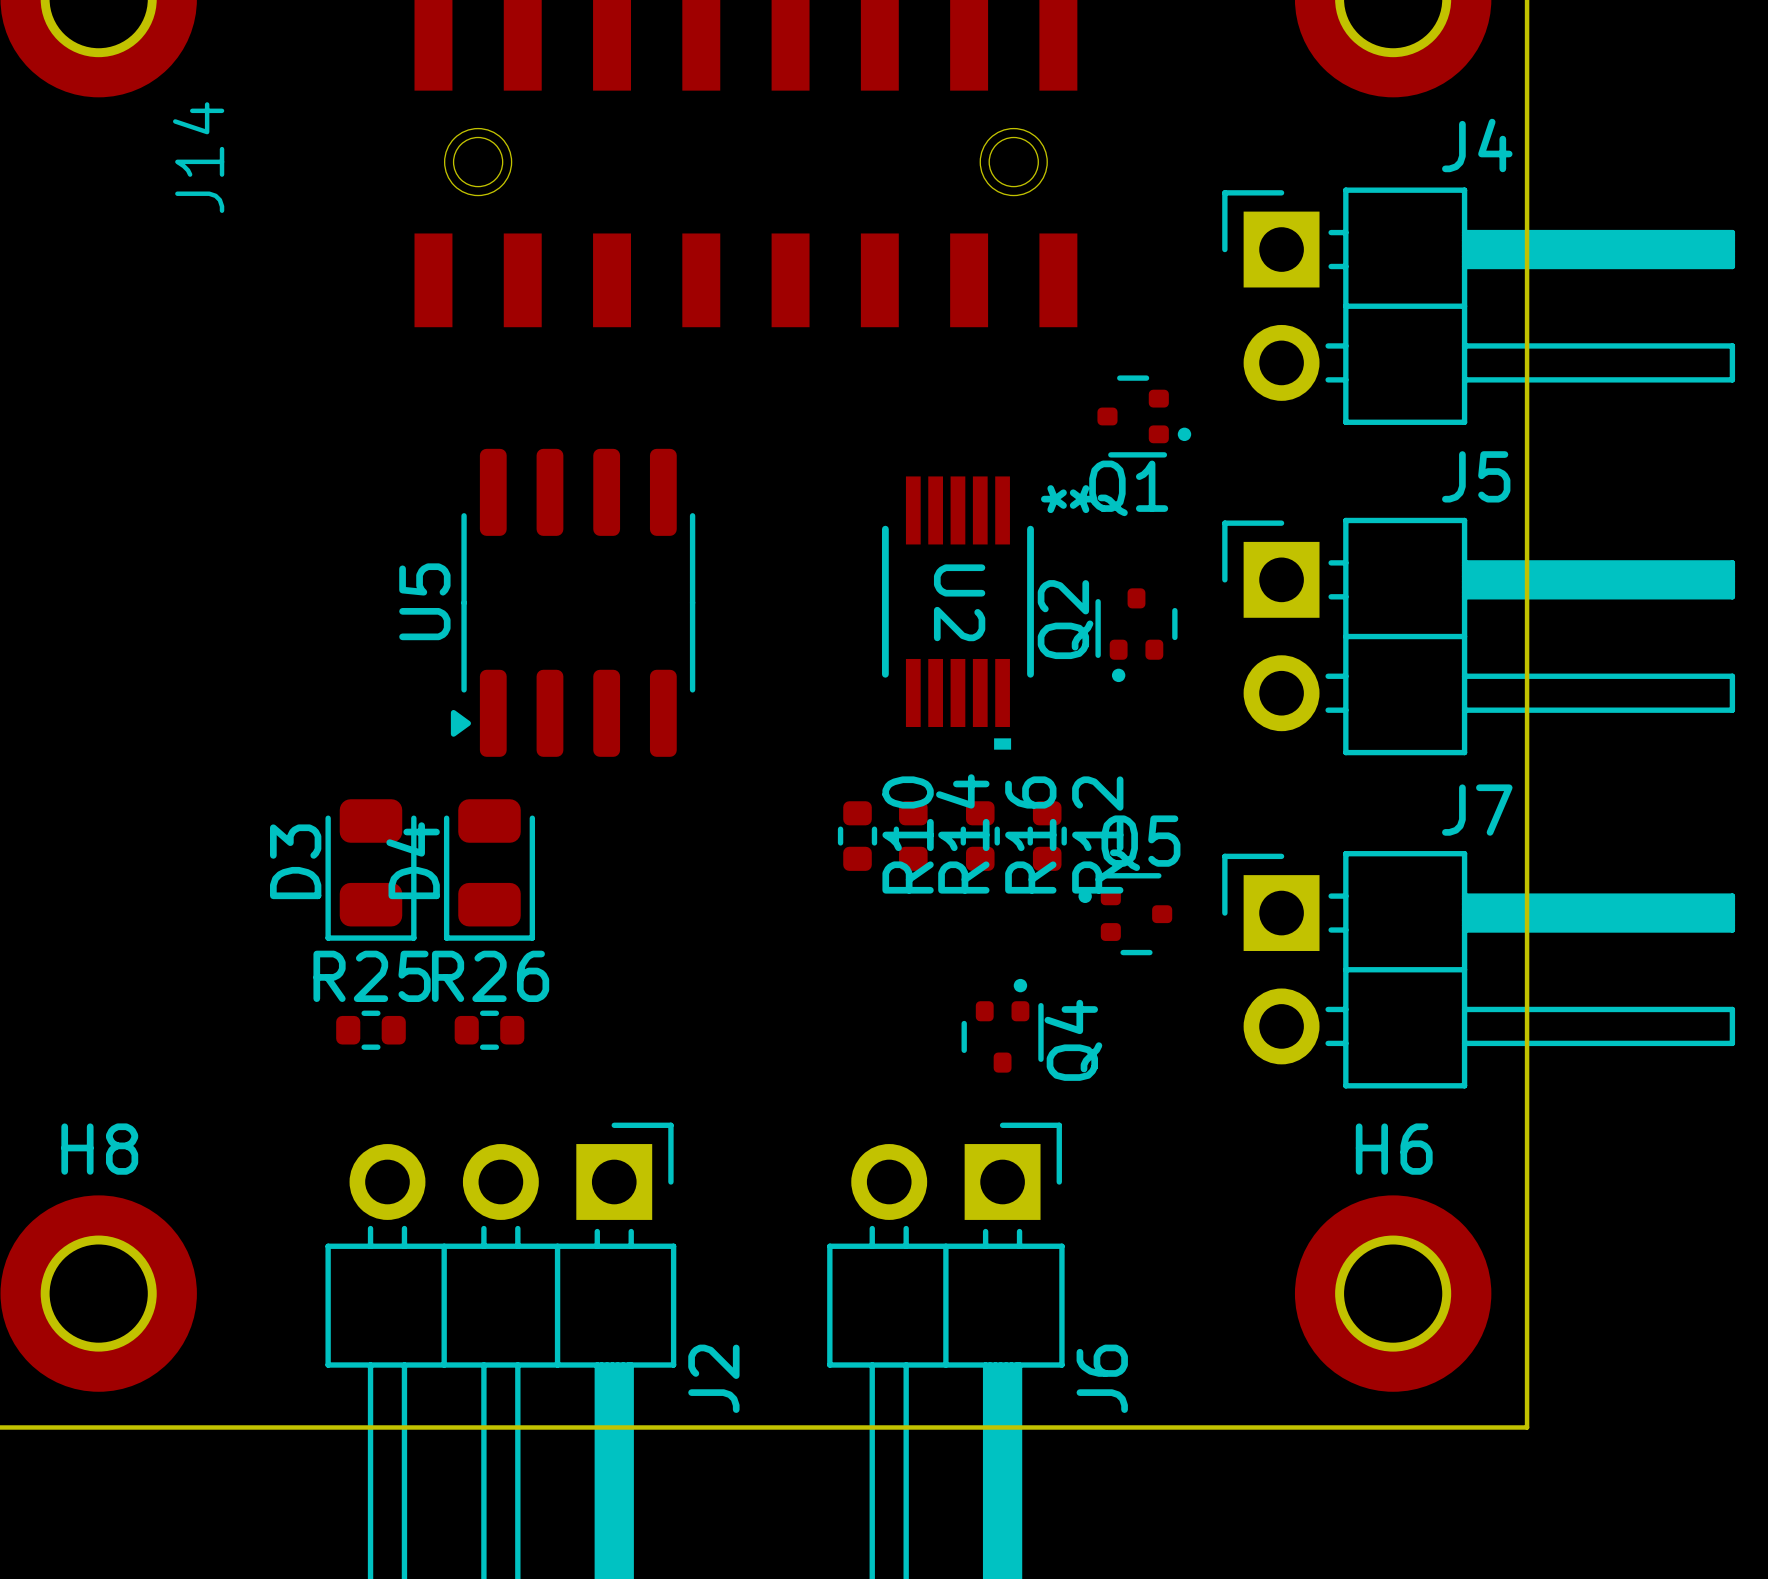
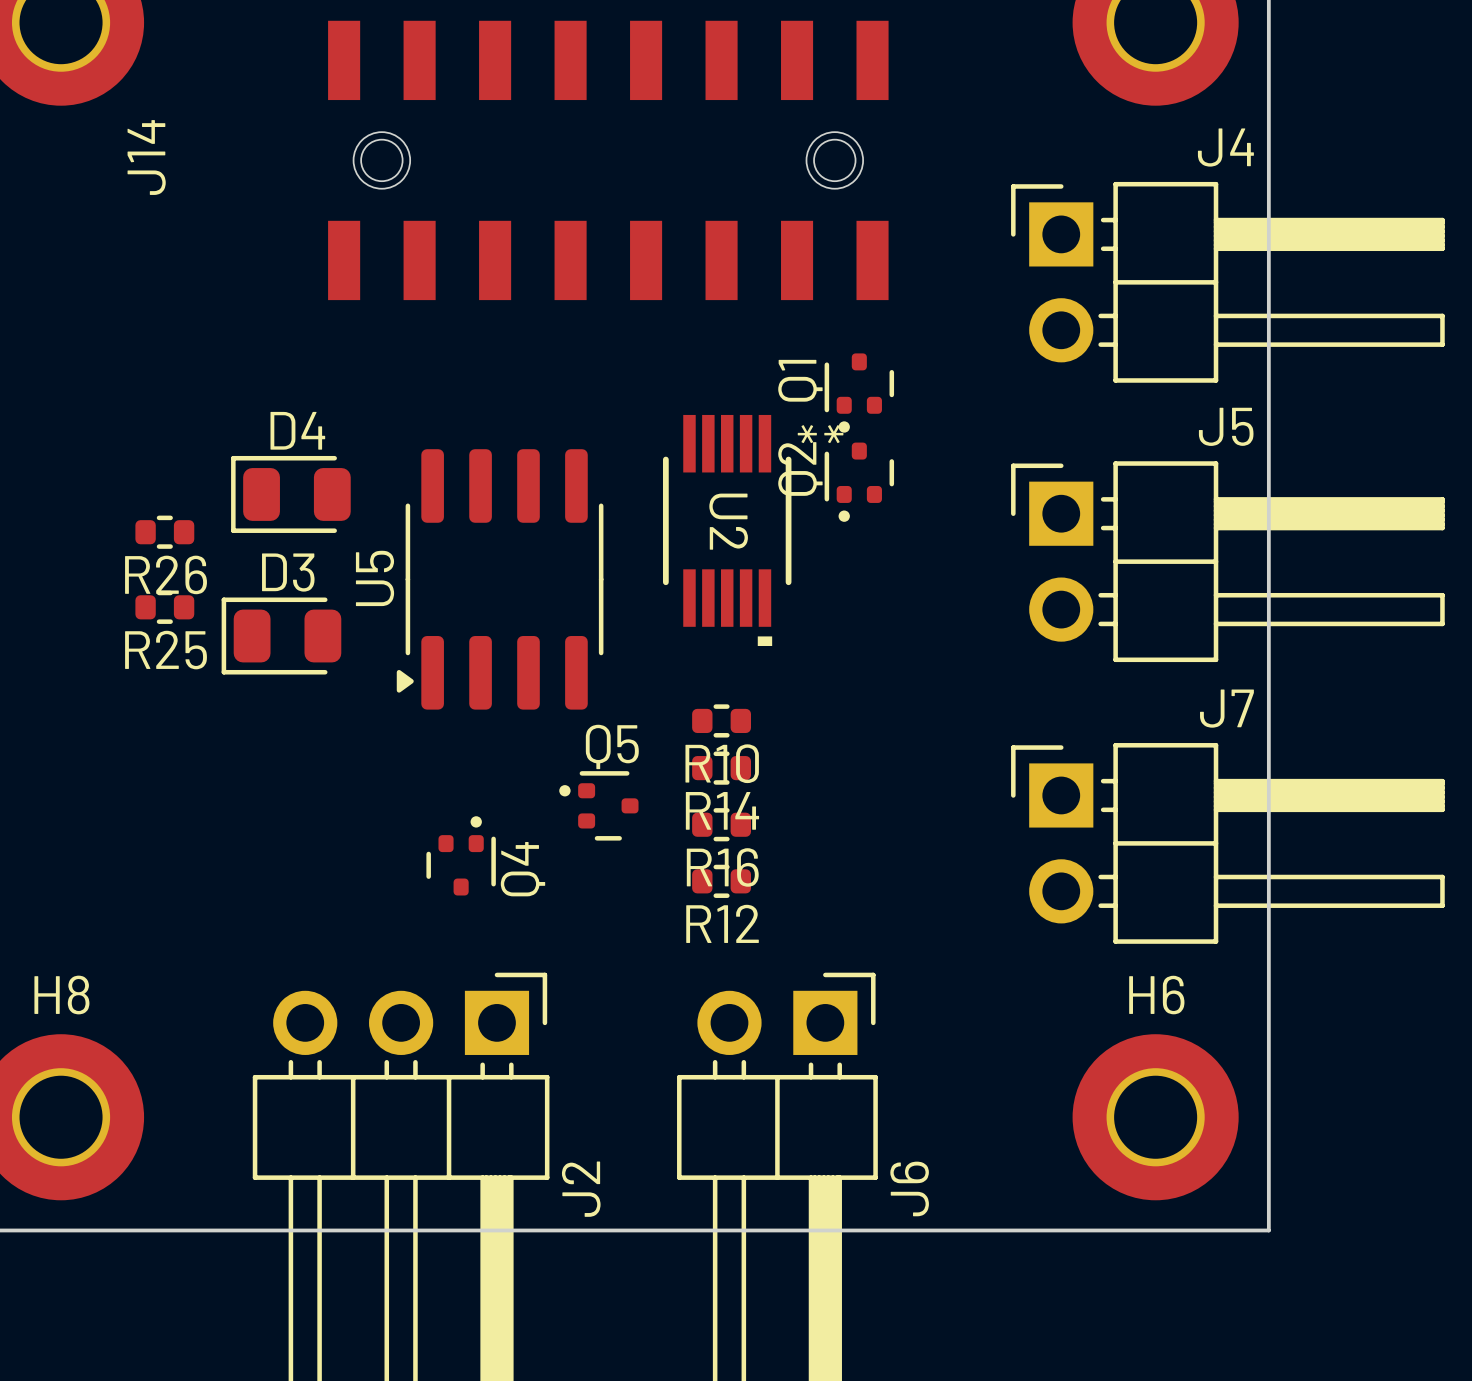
Q1 rotation: 0° (1144, 416) -> 90° clockwise (859, 393)
Q1 position: (1144, 416) -> (859, 393)
U5 position: (573, 602) -> (500, 579)
U2 position: (957, 613) -> (727, 530)
Q2 position: (1136, 635) -> (859, 482)
R10 rotation: 0° (857, 836) -> 90° clockwise (721, 720)
R14 rotation: 0° (913, 836) -> 90° clockwise (721, 768)
R14 position: (913, 836) -> (721, 768)
R16 rotation: 0° (980, 836) -> 90° clockwise (721, 824)
R16 position: (980, 836) -> (721, 824)
R12 rotation: 0° (1047, 836) -> 90° clockwise (721, 881)
R12 position: (1047, 836) -> (721, 881)
D3 rotation: 0° (370, 869) -> 90° clockwise (281, 636)
D3 position: (370, 869) -> (281, 636)
D4 rotation: 0° (489, 869) -> 90° clockwise (290, 494)
D4 position: (489, 869) -> (290, 494)
Q5 position: (1125, 914) -> (598, 805)
R25 name position: R25 (372, 976) -> R25 (166, 650)
R26 name position: R26 (490, 976) -> R26 (166, 574)
Q4 position: (1002, 1025) -> (461, 855)
R25 position: (370, 1030) -> (164, 607)
R26 position: (489, 1030) -> (164, 532)

